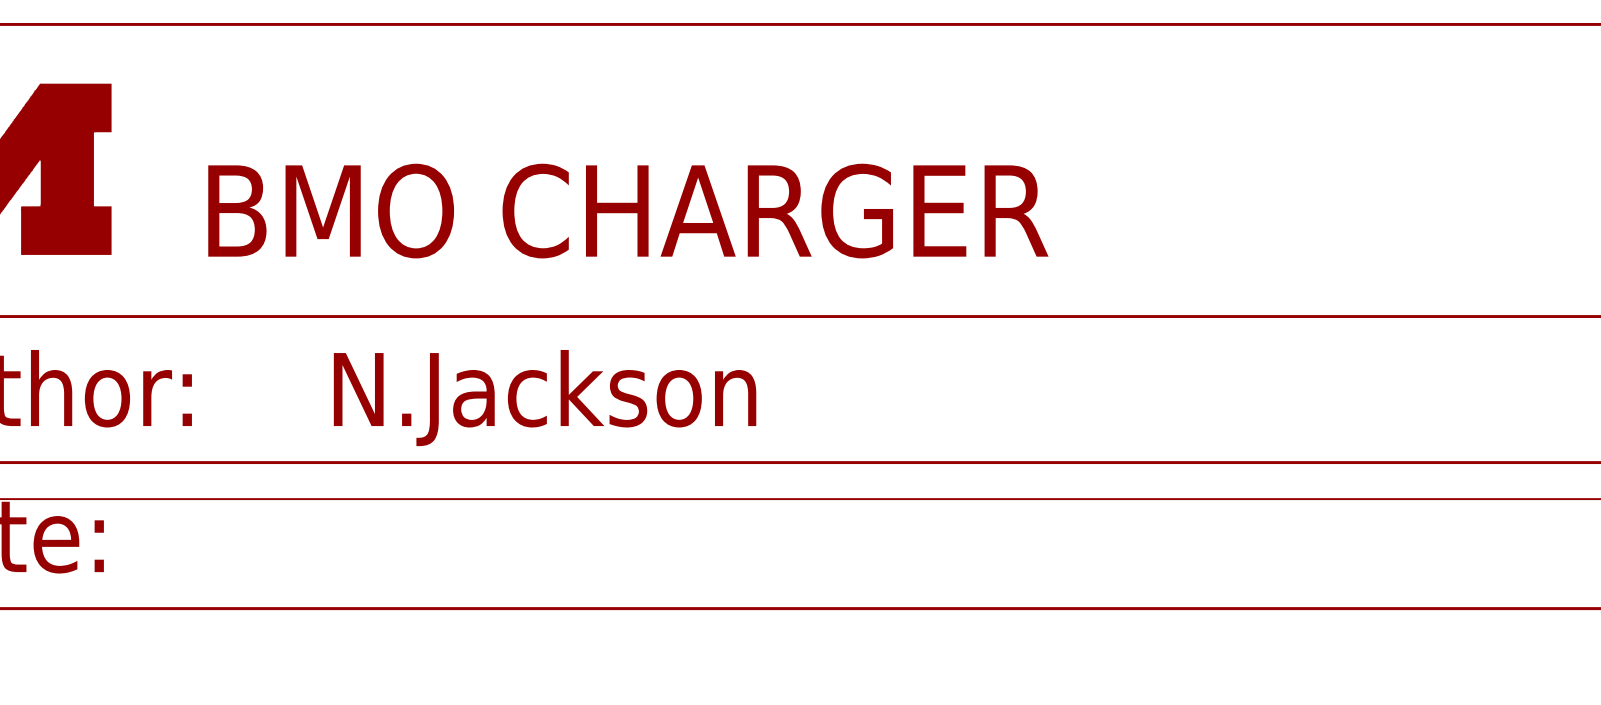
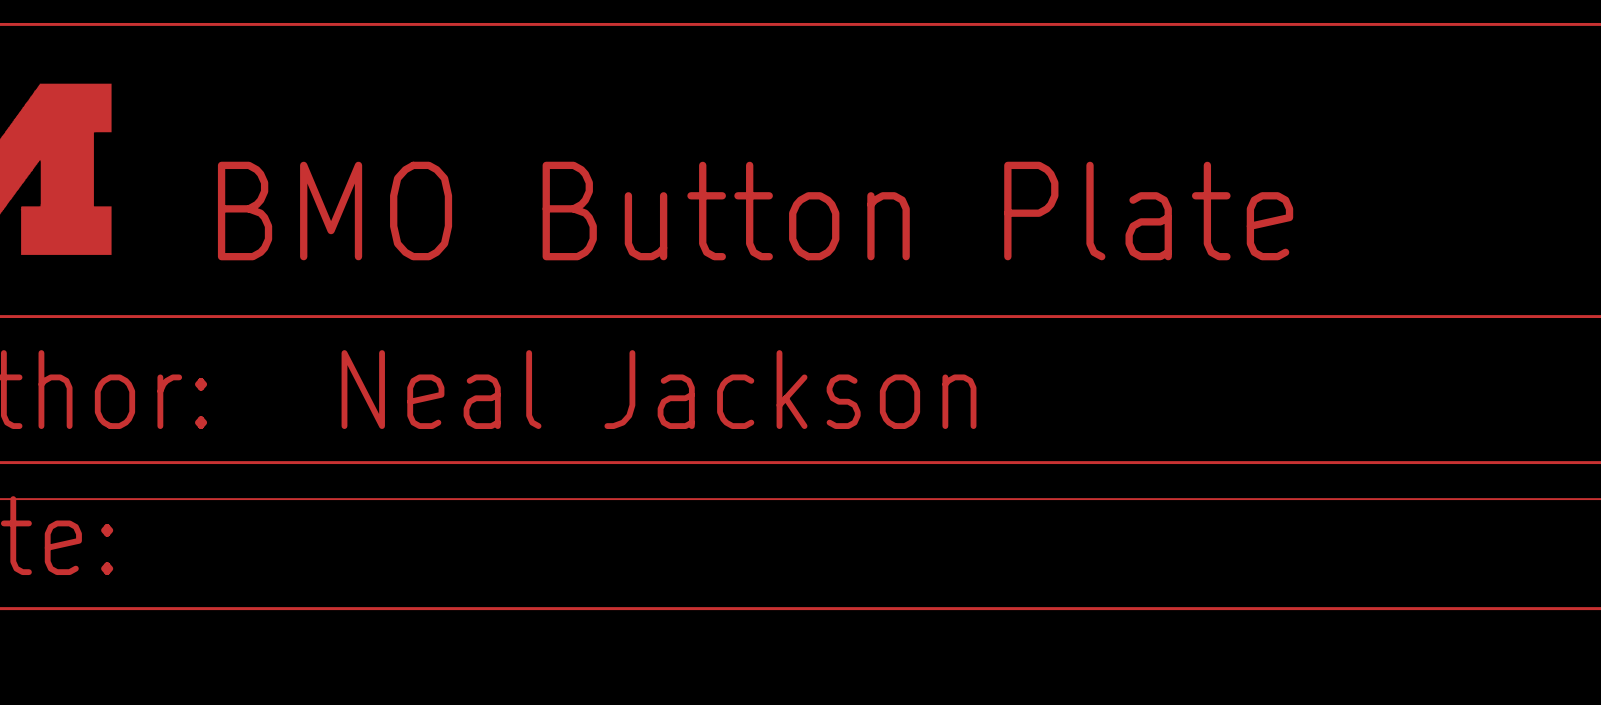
part text: BMO CHARGER (628, 211) -> BMO Button Plate (755, 211)
part text: N.Jackson (545, 398) -> Neal Jackson (659, 389)

